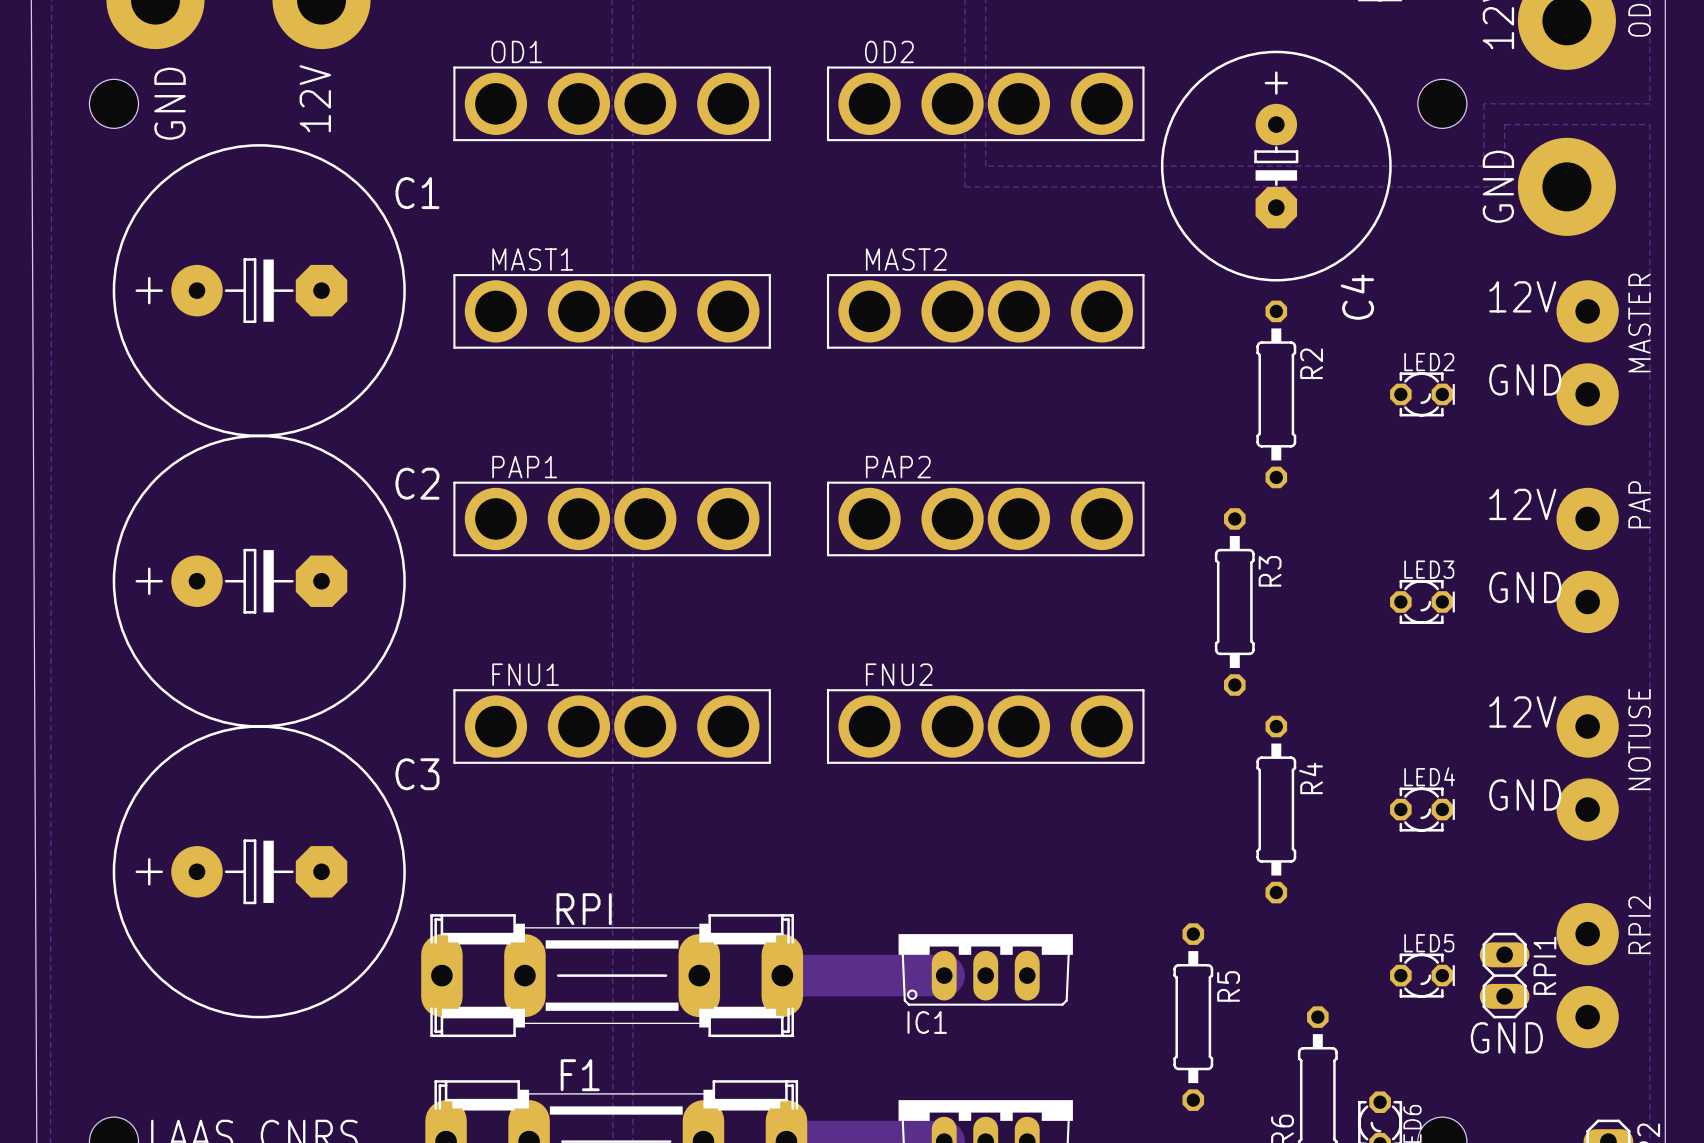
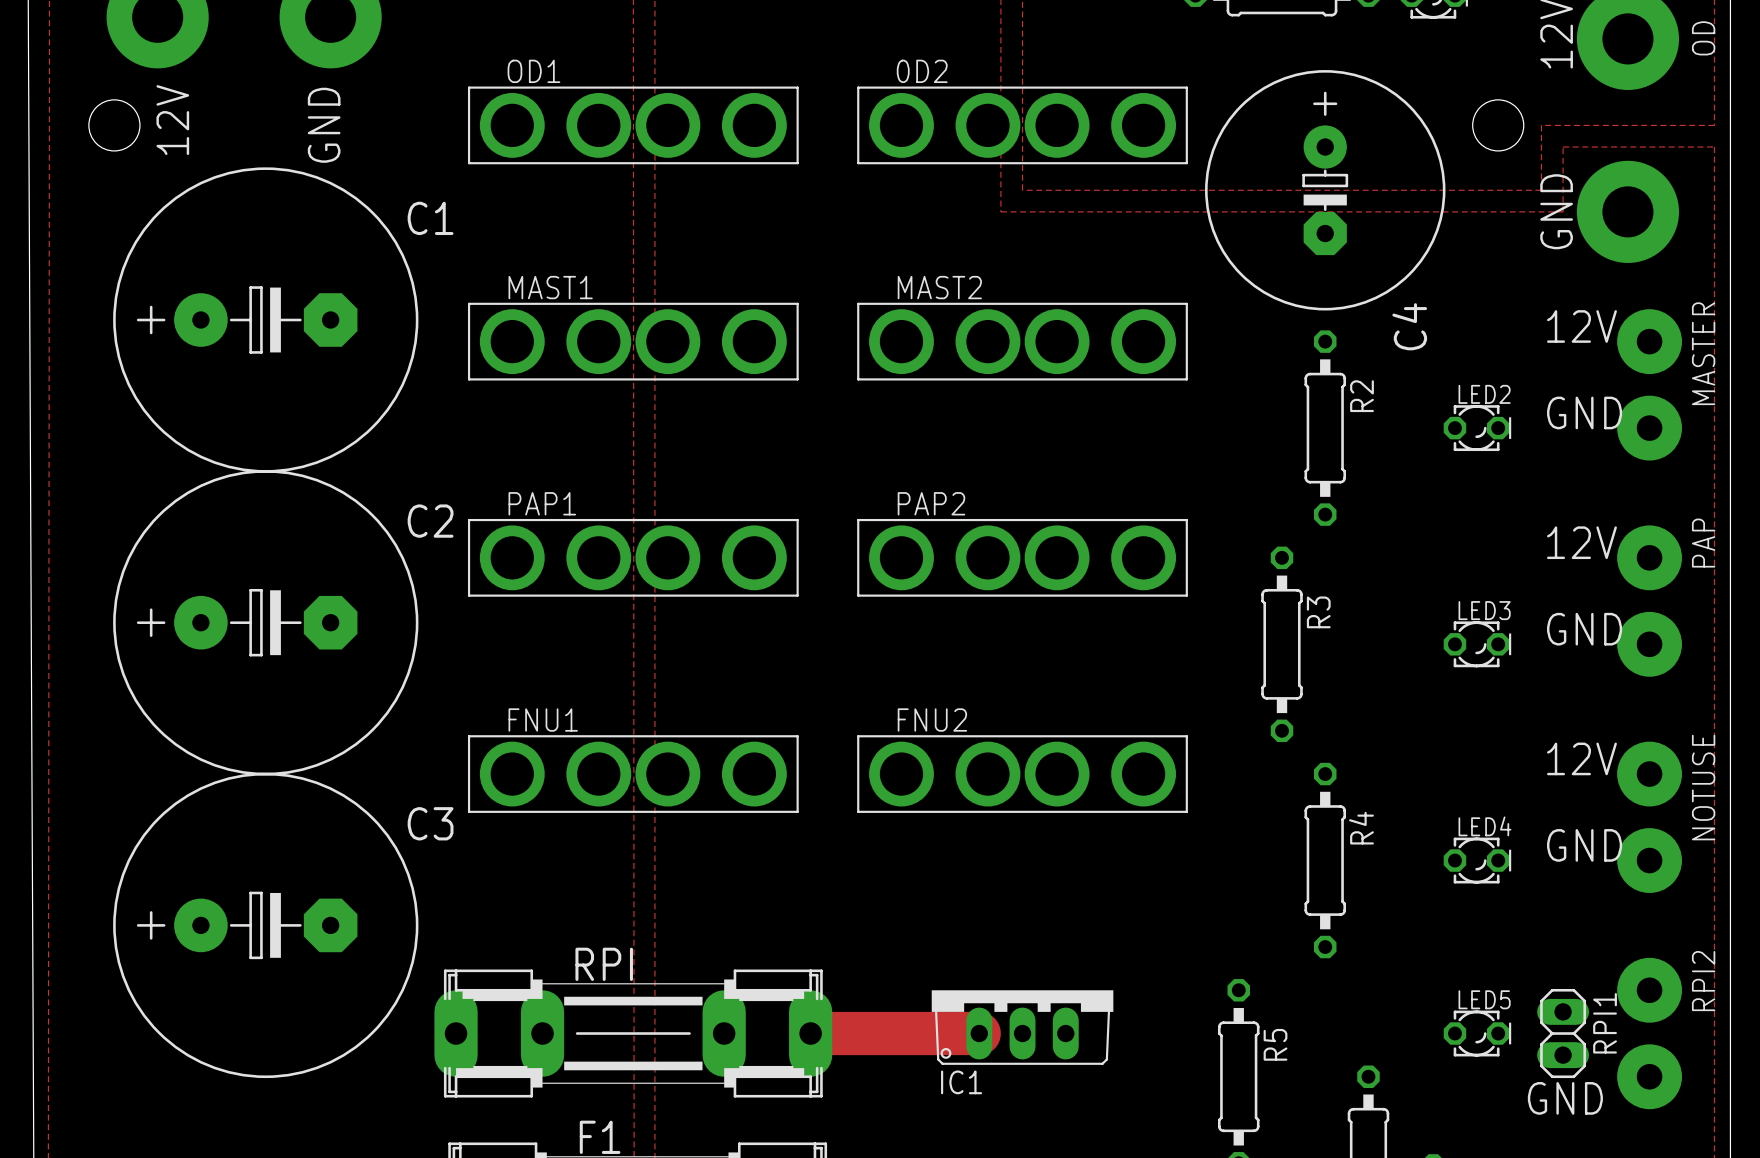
text: 12V (315, 98) -> GND (324, 125)
text: GND (170, 103) -> 12V (172, 120)

